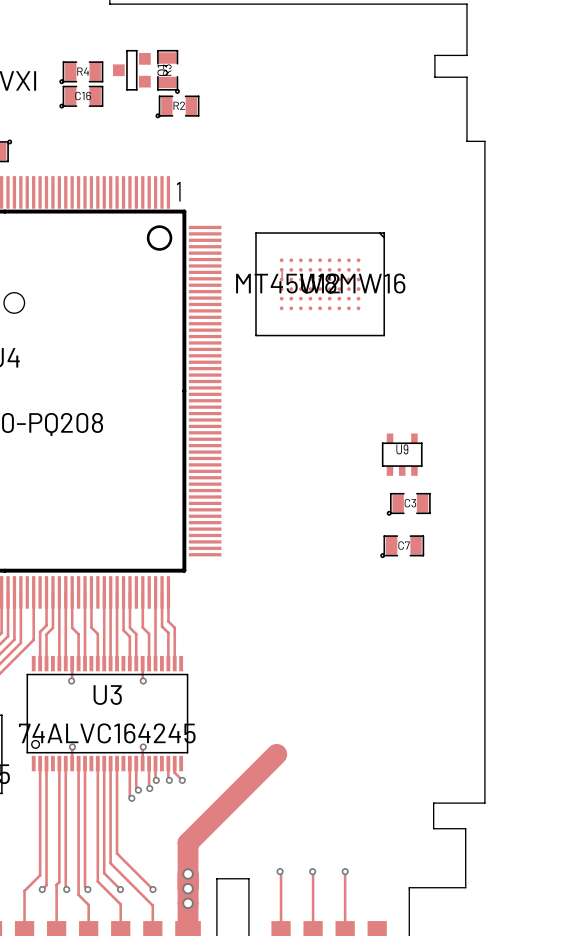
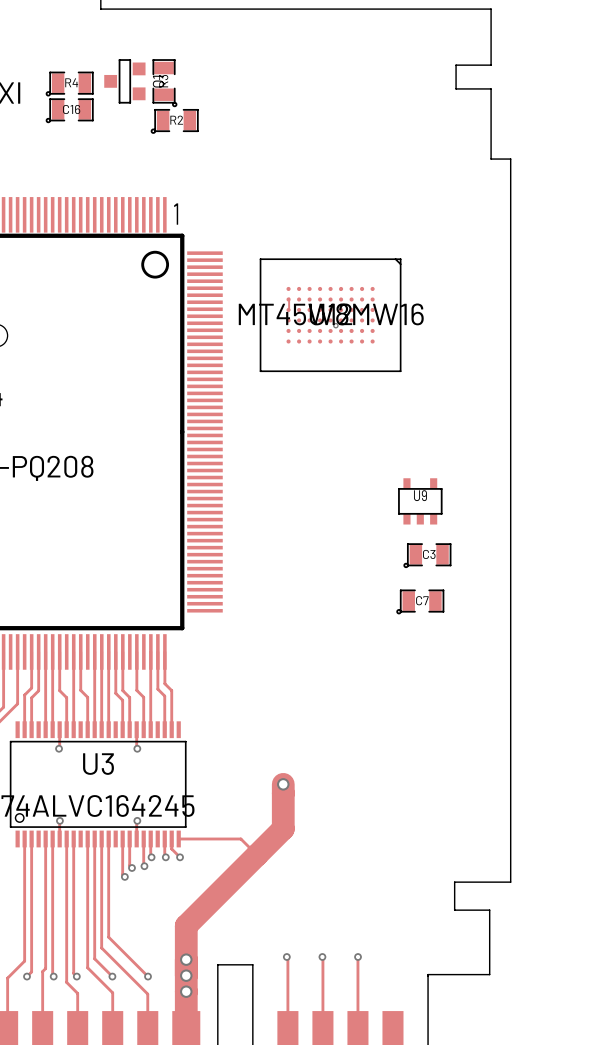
via: none -> (335, 325)
track: none -> (283, 784) (283, 828)
via: none -> (283, 784)
track: none -> (178, 838) (240, 838) (257, 855)

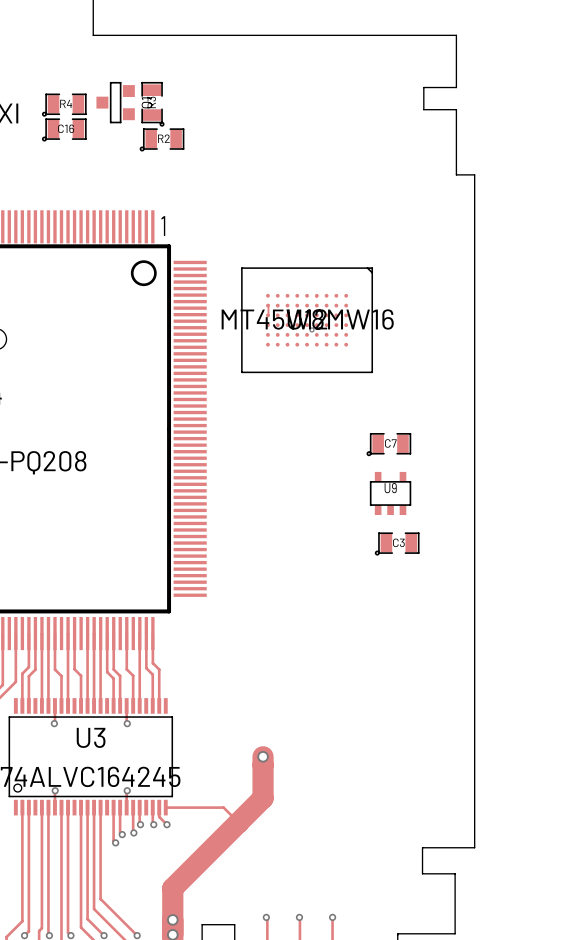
C7 position: (420, 601) -> (388, 444)

